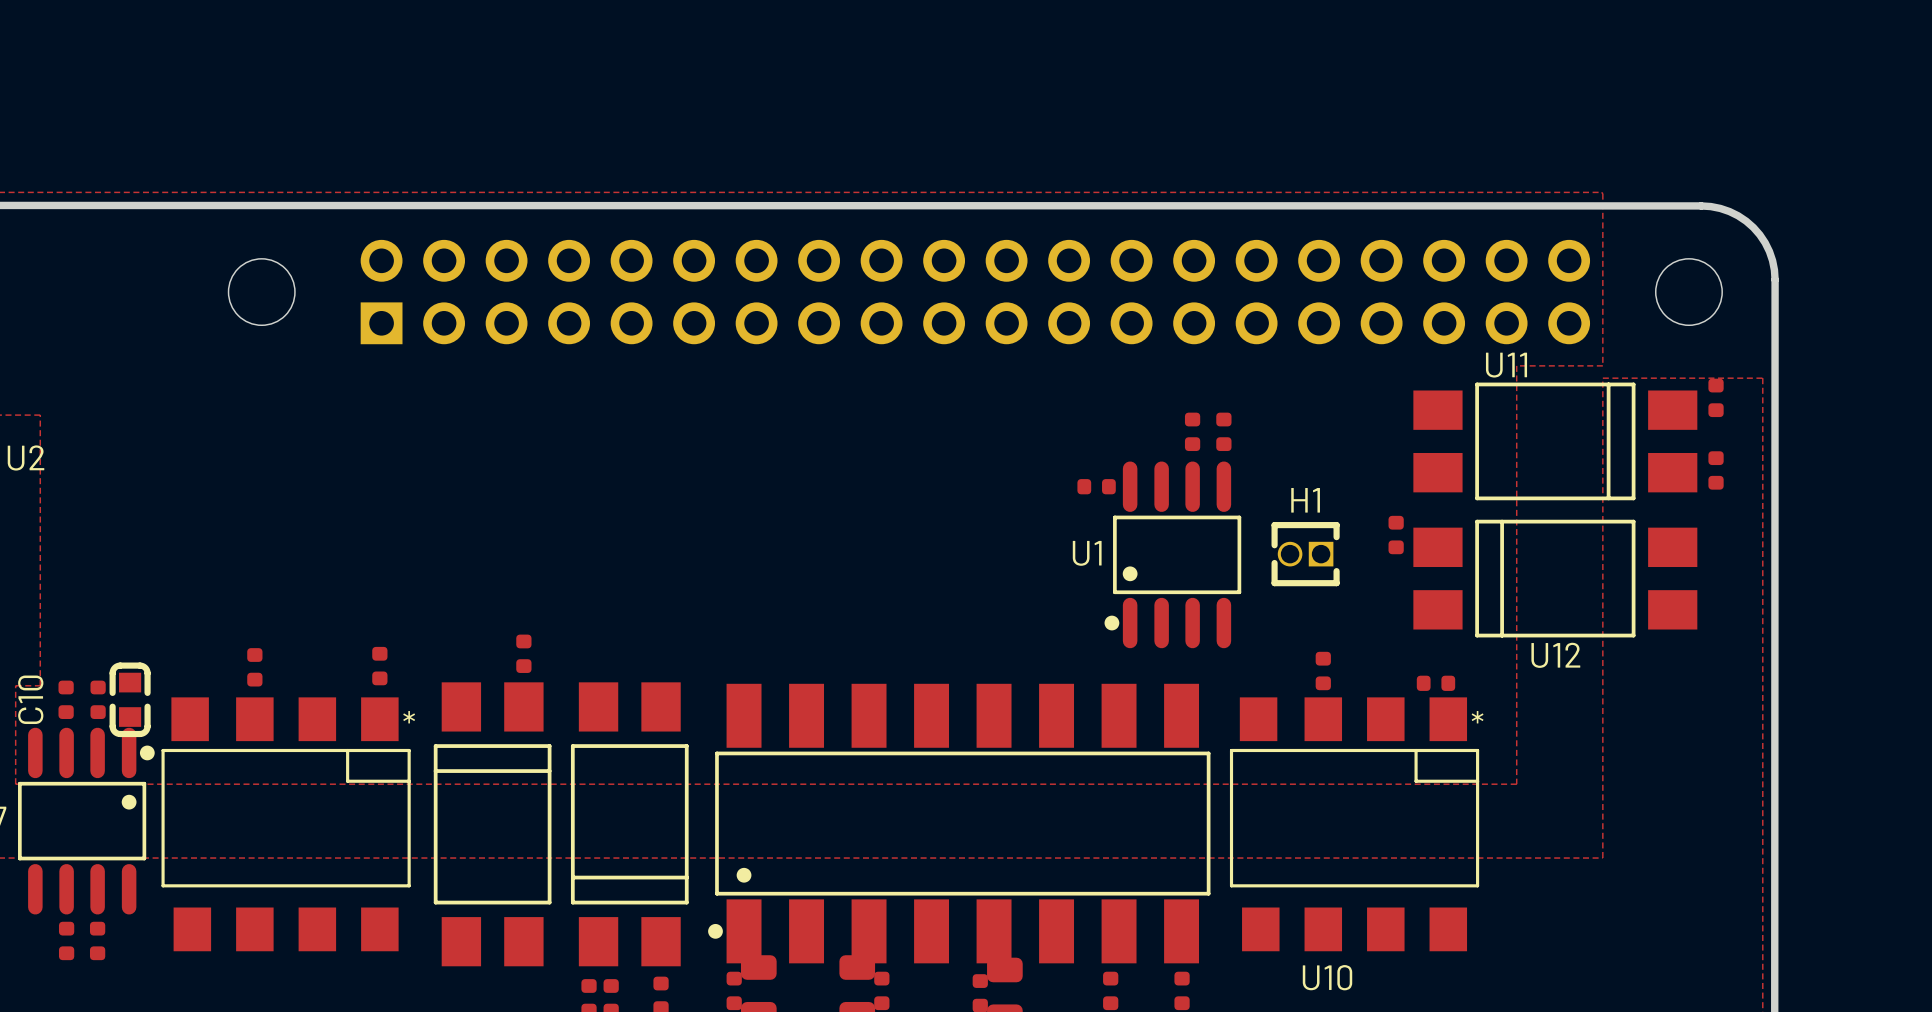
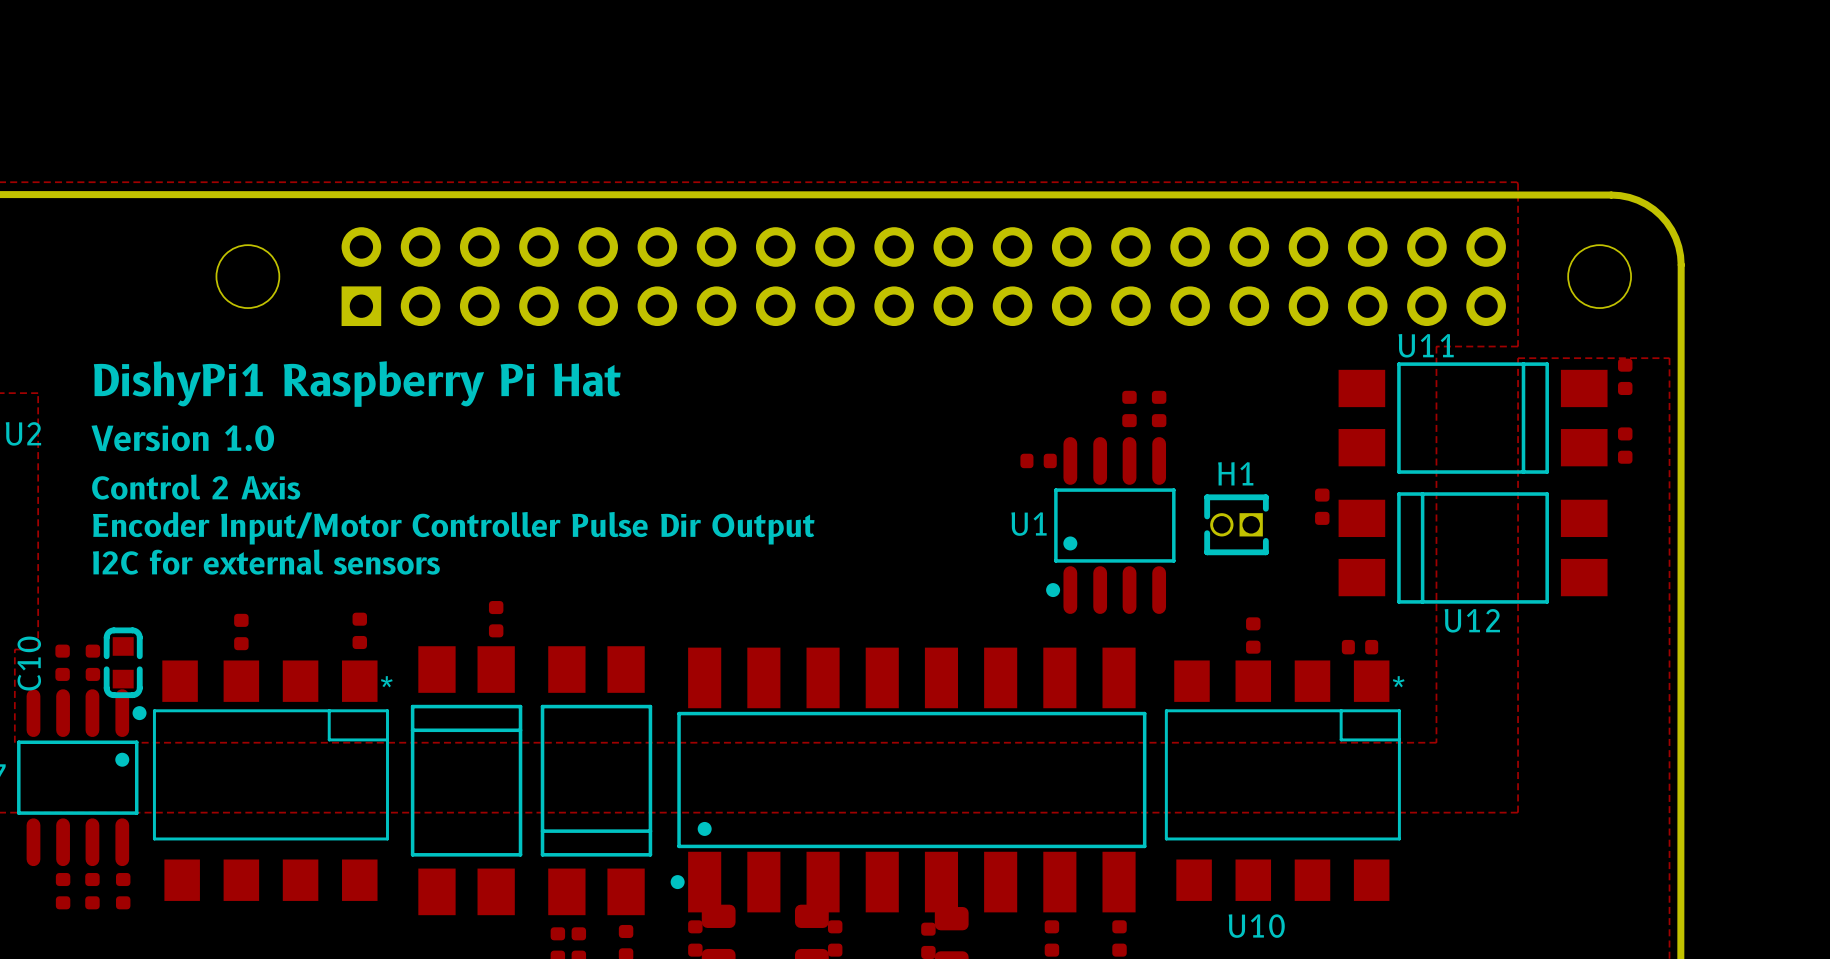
text: none -> DishyPi1 Raspberry Pi Hat (357, 384)
text: none -> Version 1.0 (182, 438)
text: none -> Control 2 Axis (196, 487)
text: none -> Encoder Input/Motor Controller Pulse Dir Output (453, 528)
text: none -> I2C for external sensors (266, 562)
part: none -> (123, 891)

